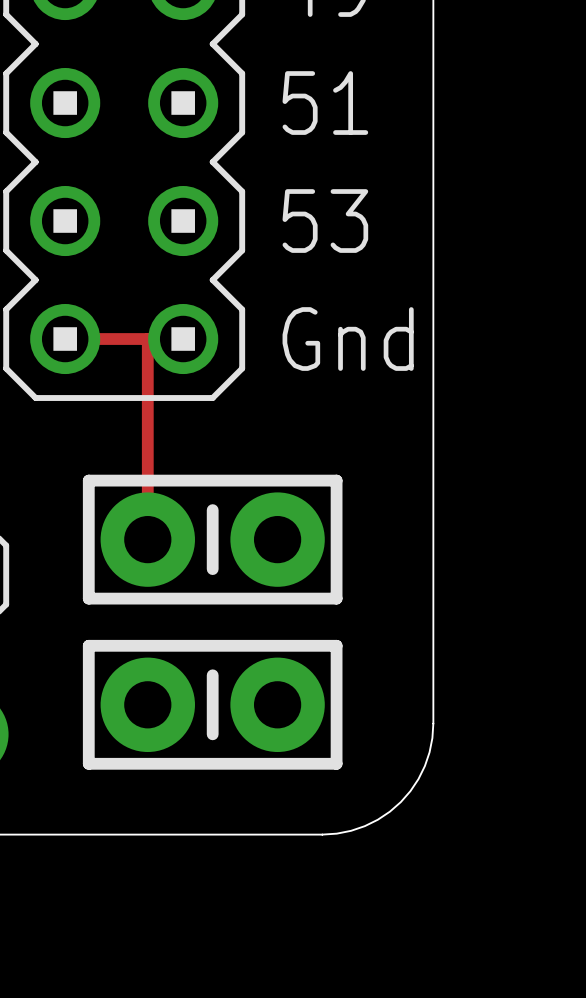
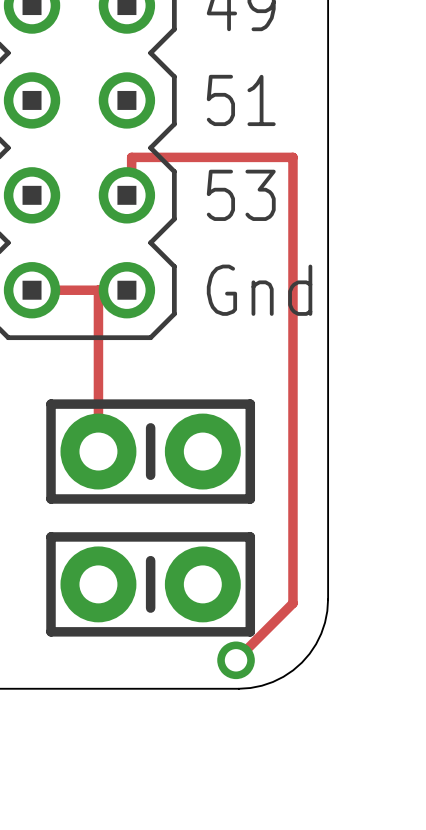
track: none -> (126, 195) (131, 195) (131, 157) (292, 157) (292, 603) (236, 660)
via: none -> (236, 660)

